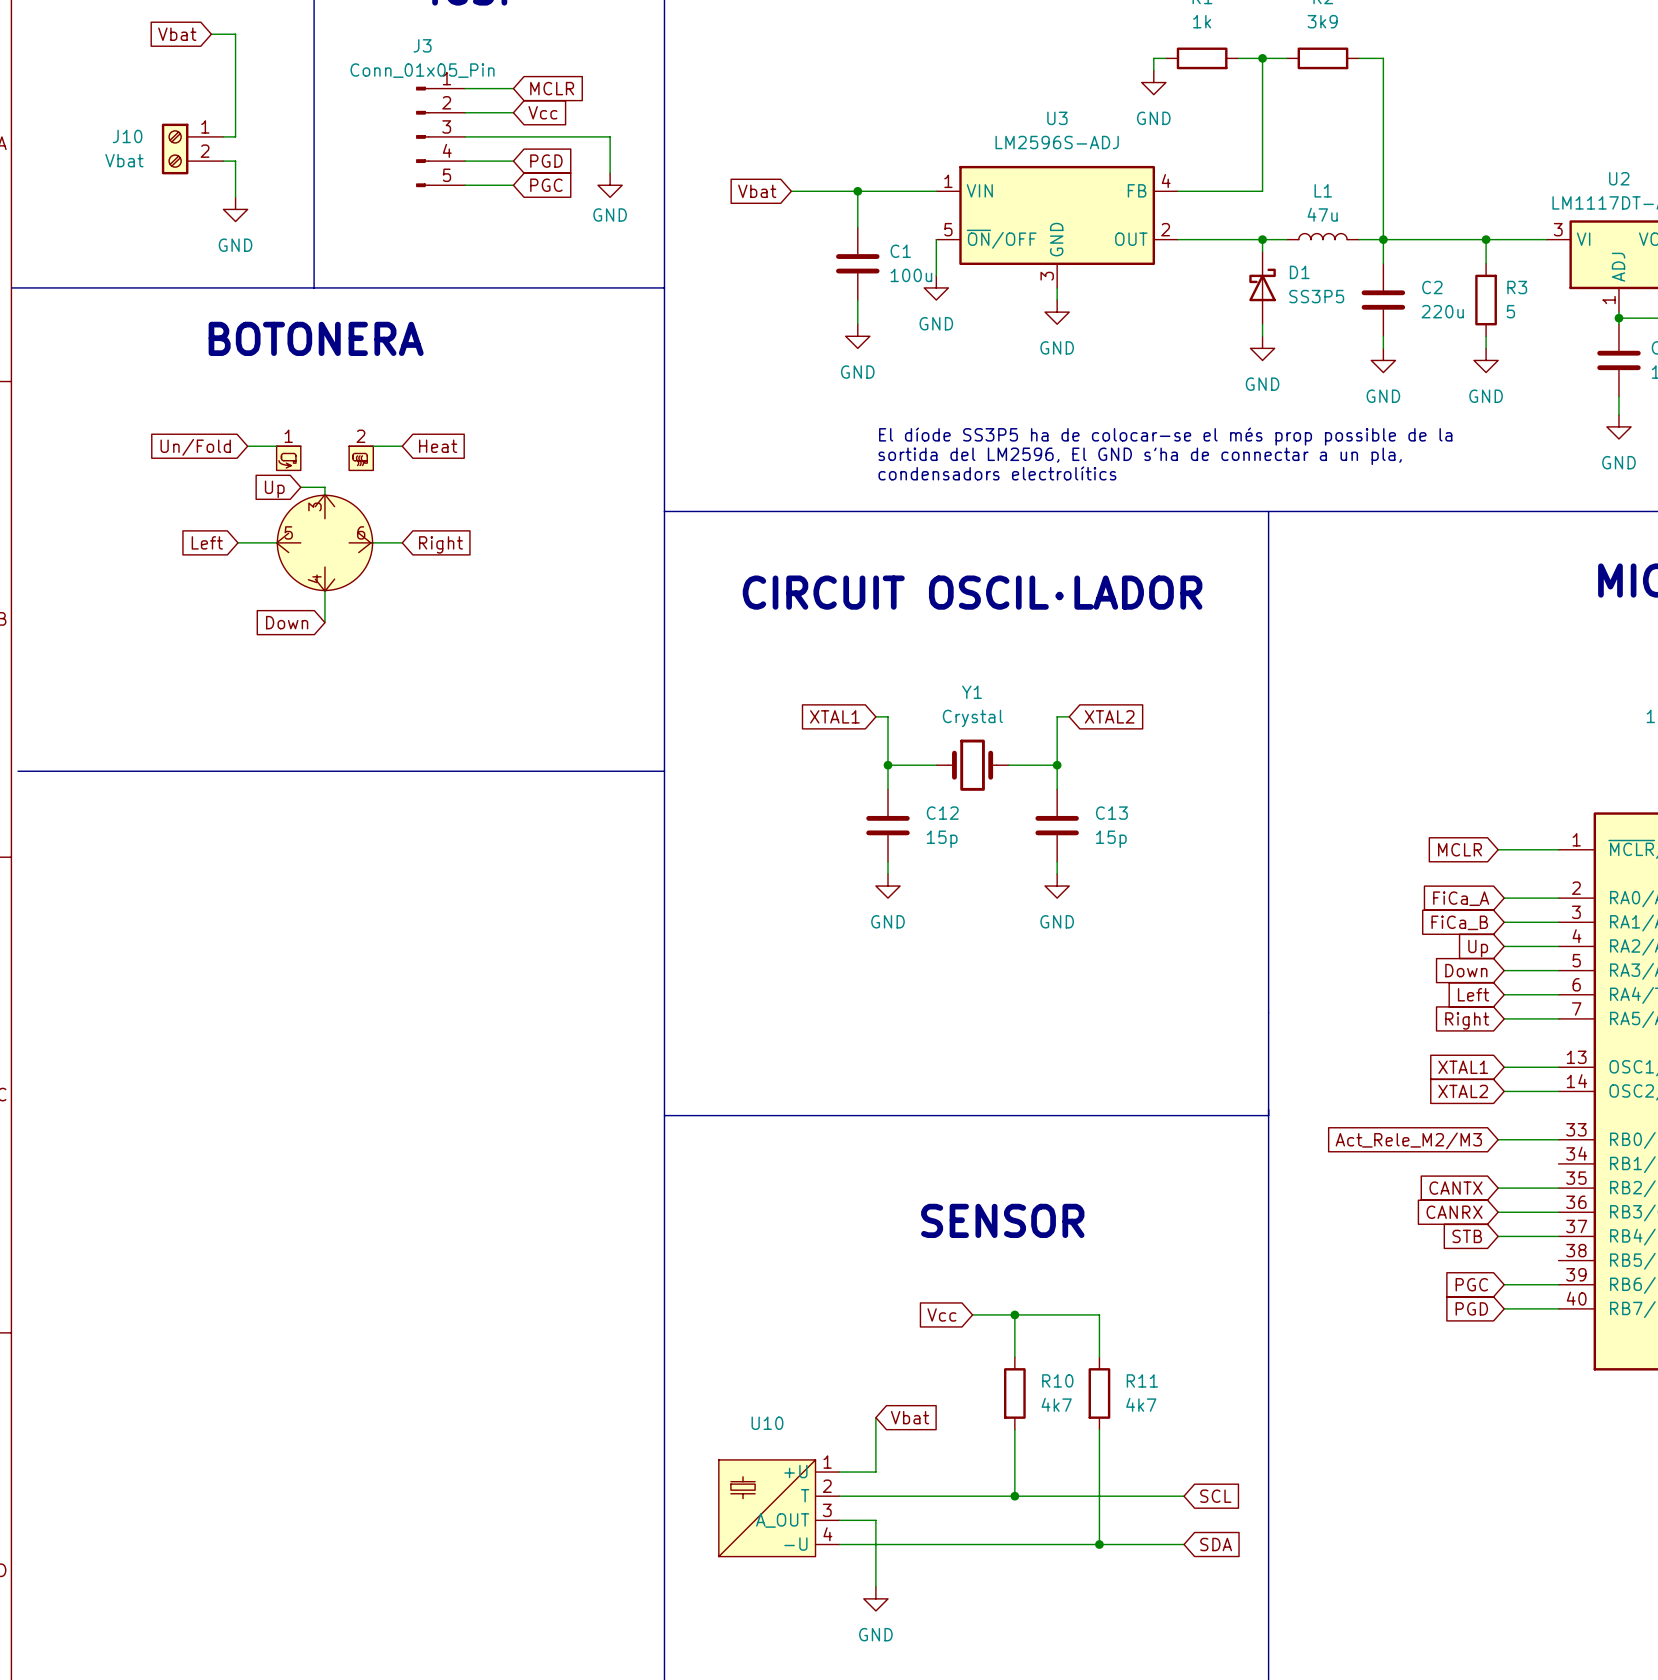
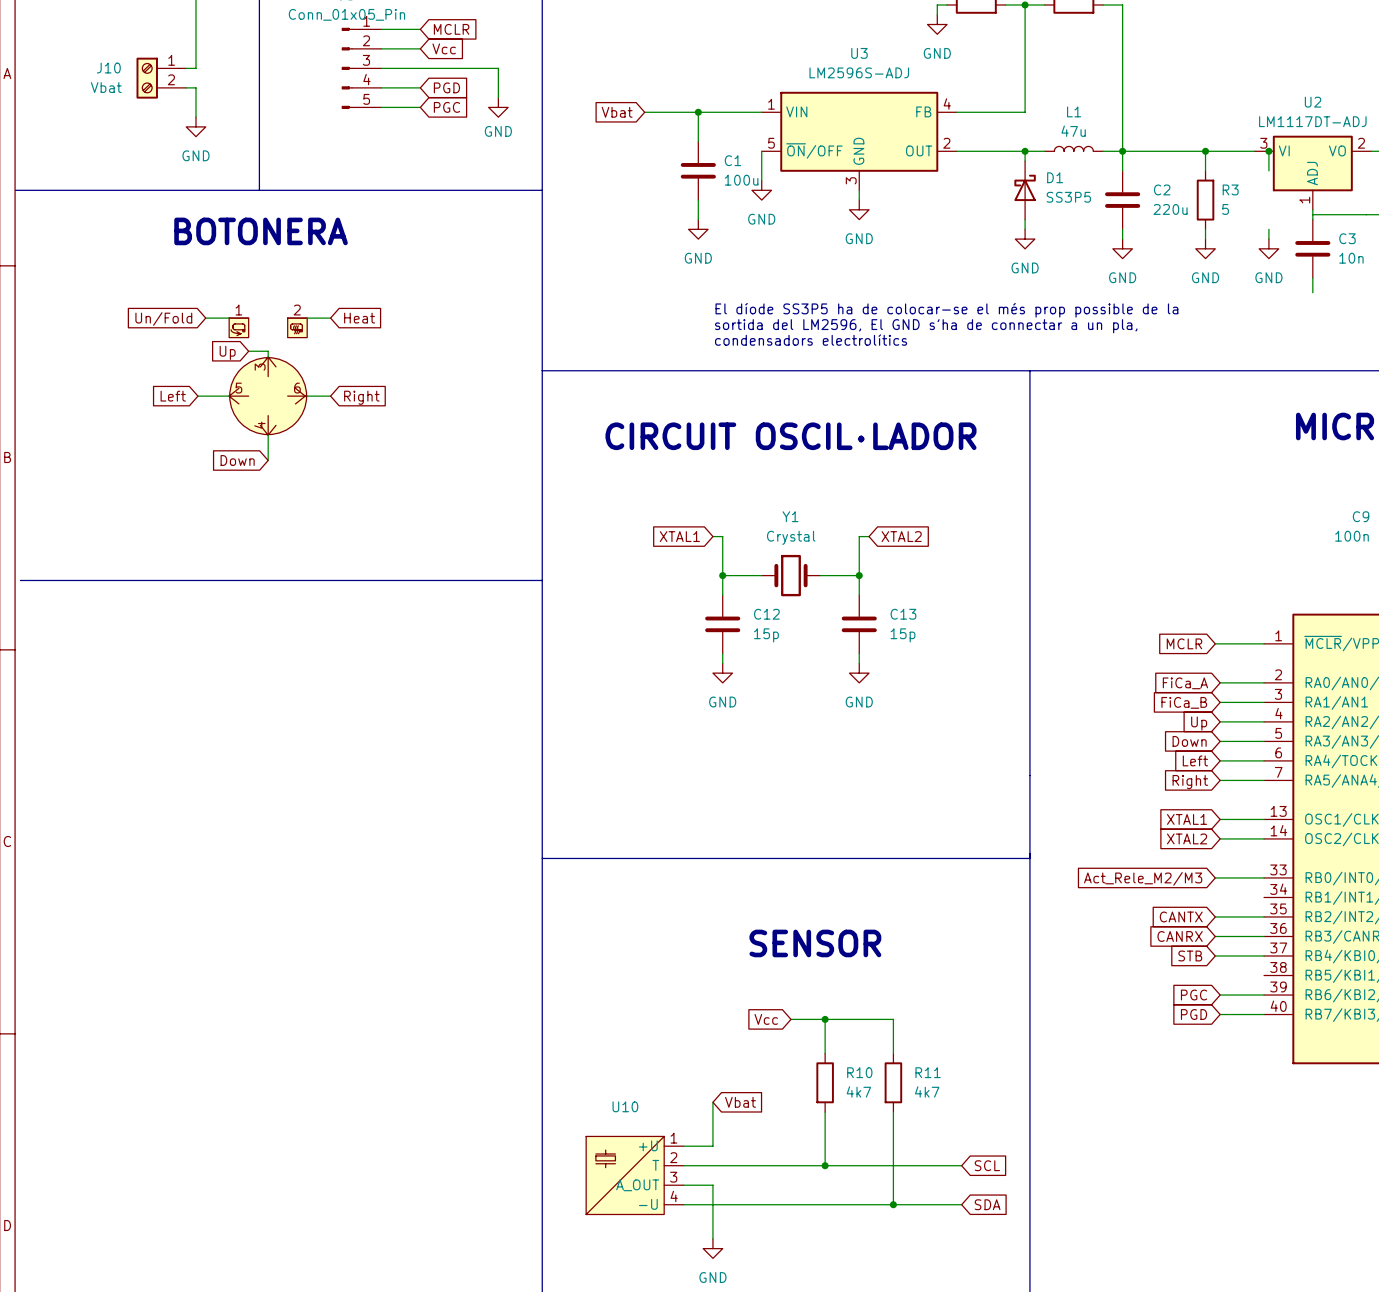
wire: none -> (1268, 151) (1268, 170)
junction: none -> (1268, 151)
junction: (1618, 318) -> none
wire: none -> (1268, 229) (1268, 239)
power symbol position: GND (1618, 426) -> GND (1268, 248)

